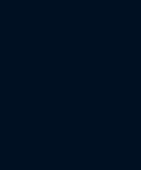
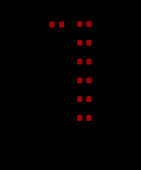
part: none -> (56, 24)
part: none -> (84, 24)
part: none -> (84, 42)
part: none -> (84, 61)
part: none -> (84, 80)
part: none -> (84, 99)
part: none -> (84, 117)

